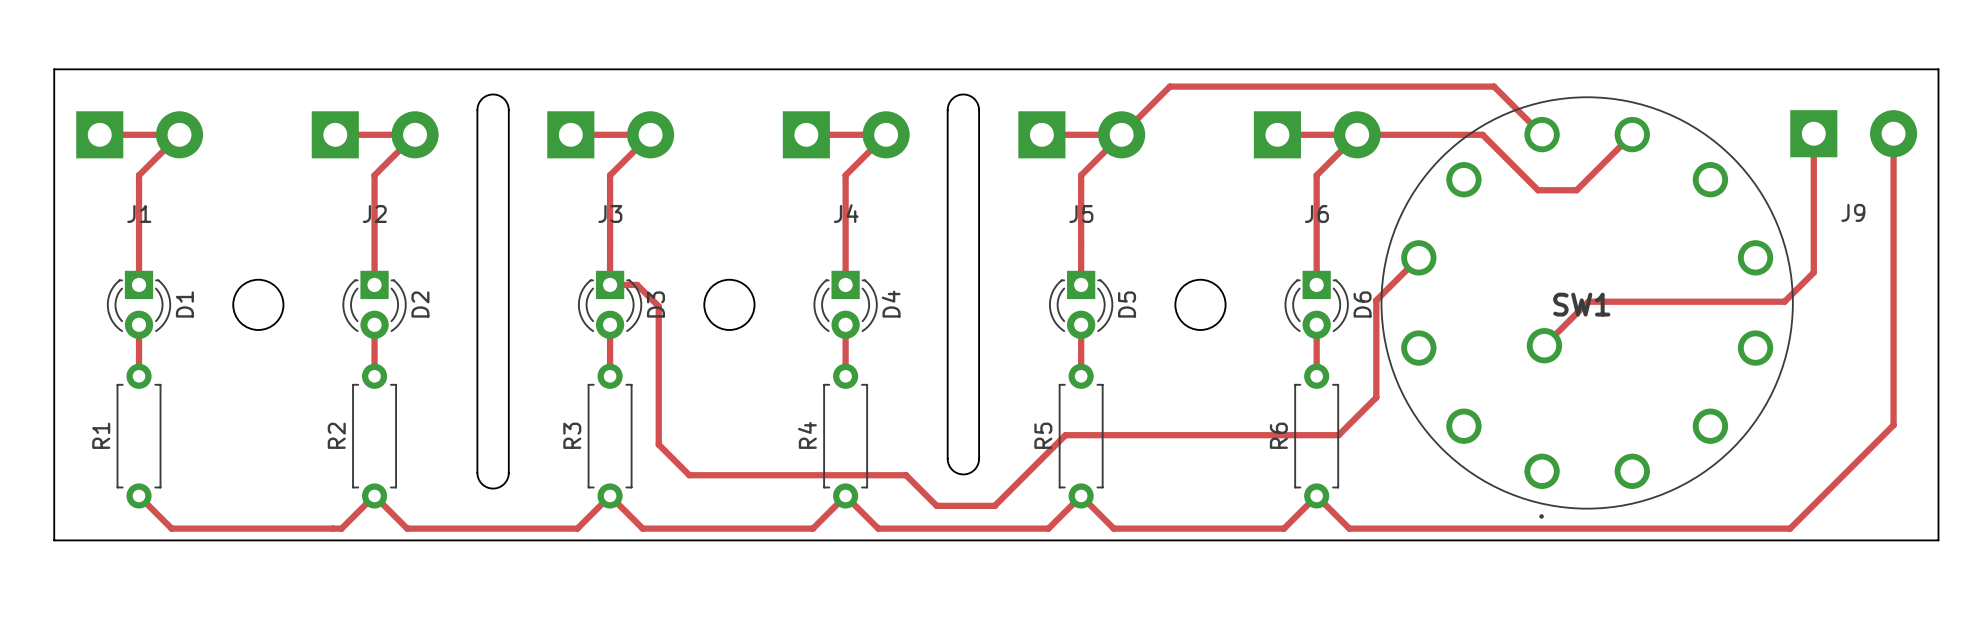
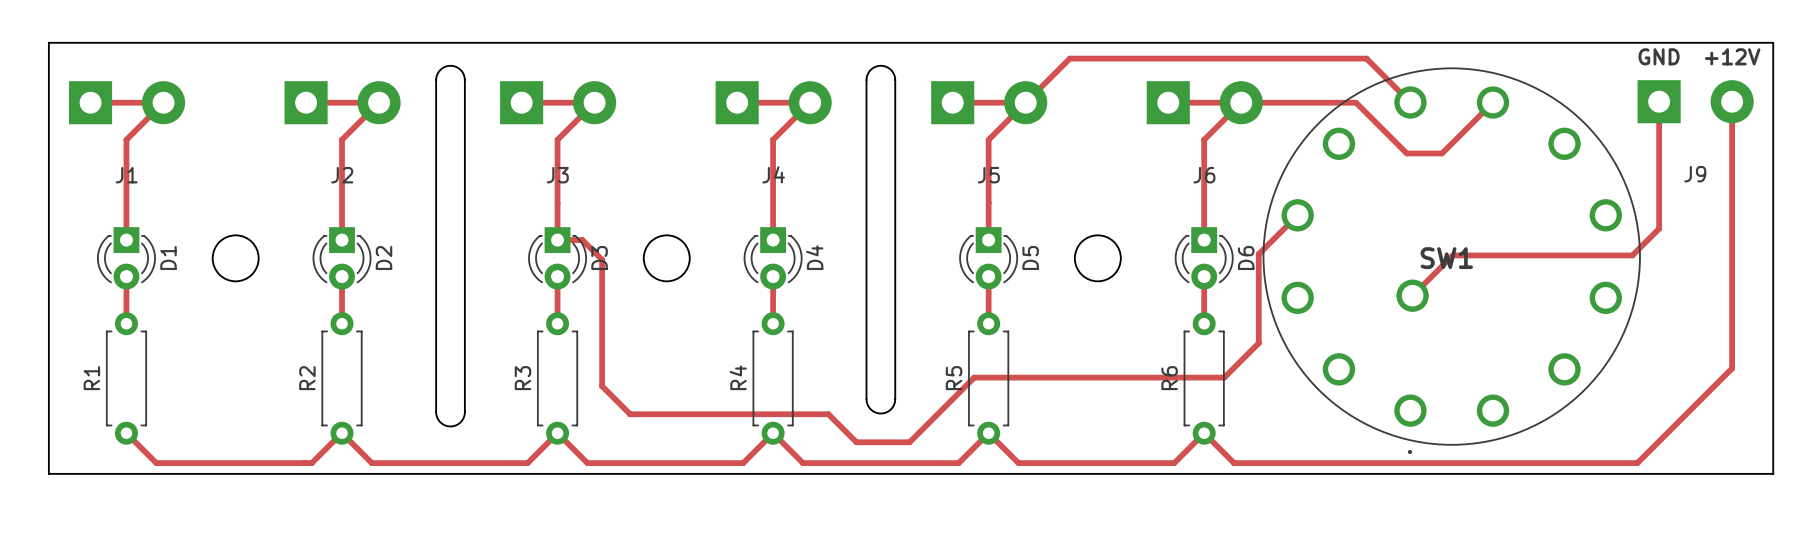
text: none -> GND +12V (1699, 56)

